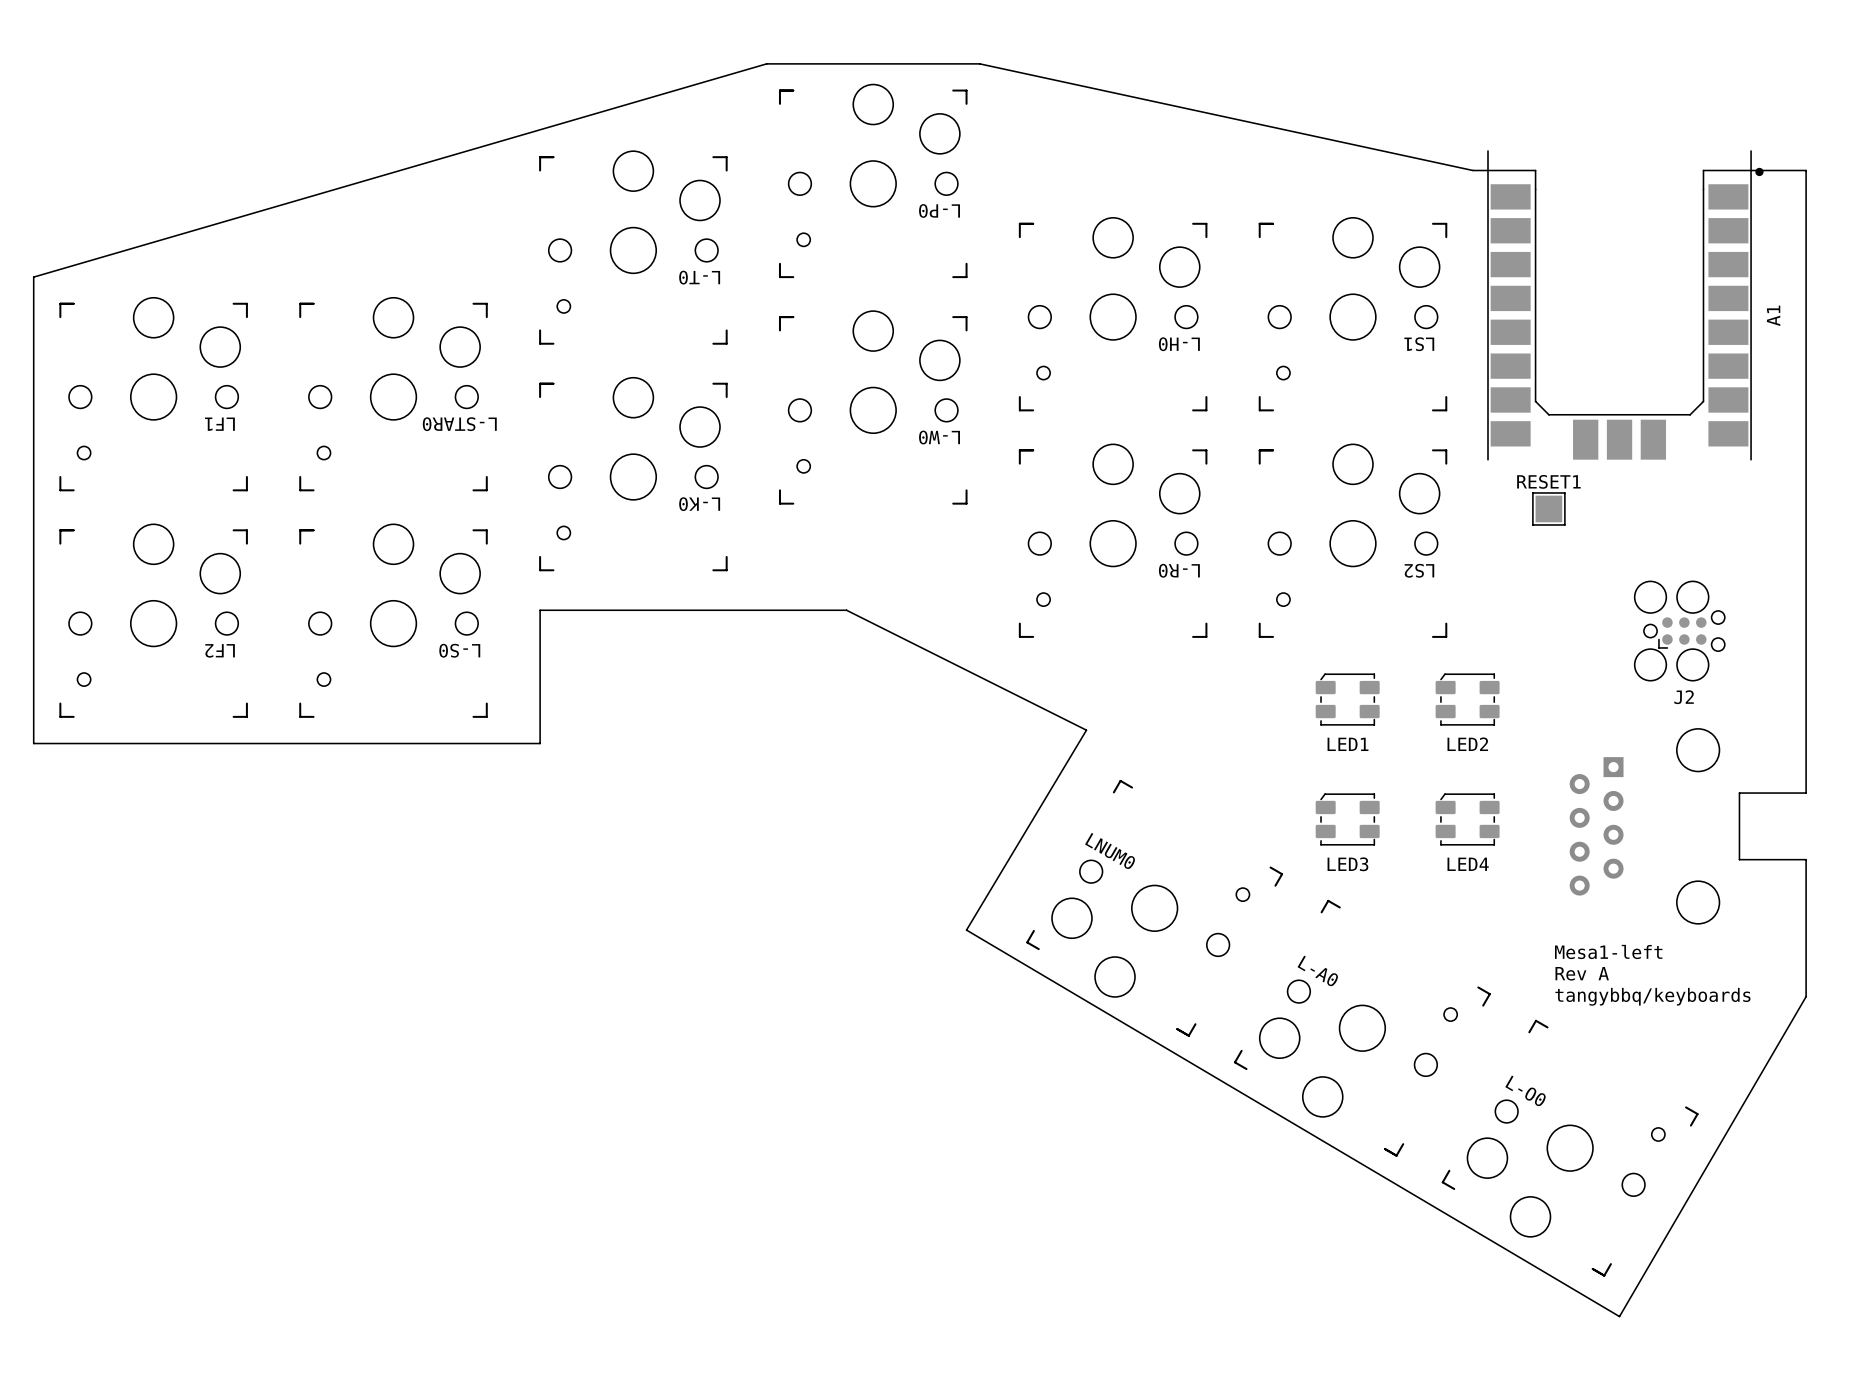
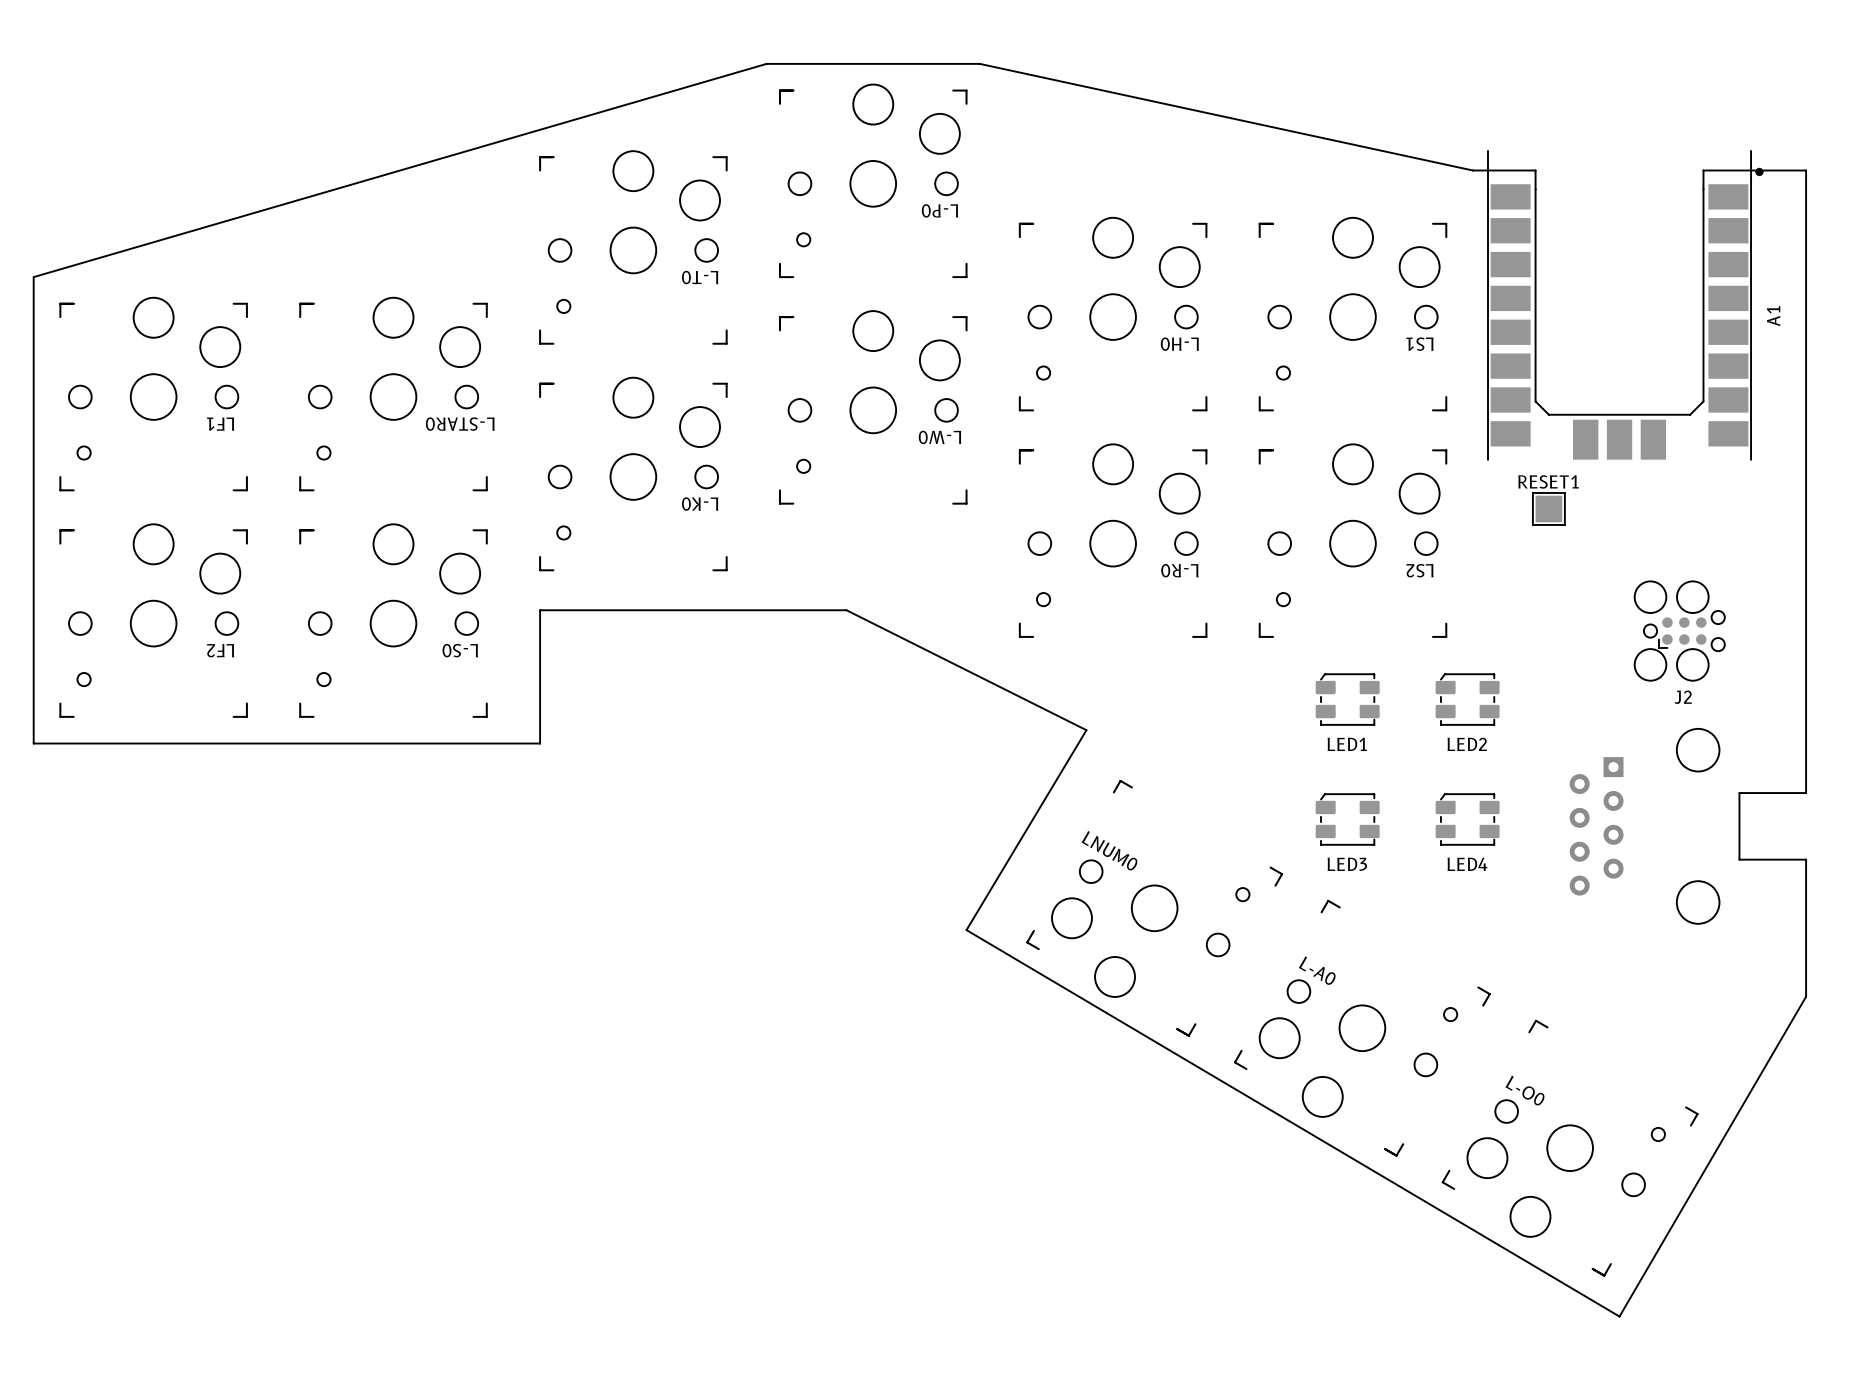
text: Mesa1-left (1608, 951) -> none
text: Rev A (1582, 973) -> none
text: tangybbq/keyboards (1652, 996) -> none

